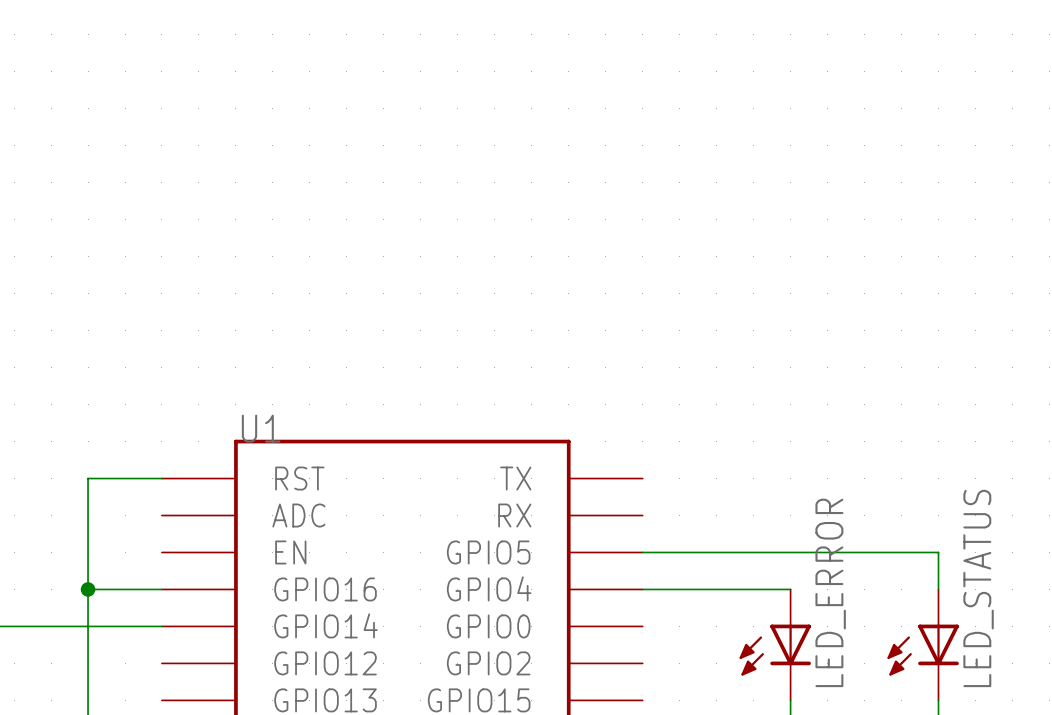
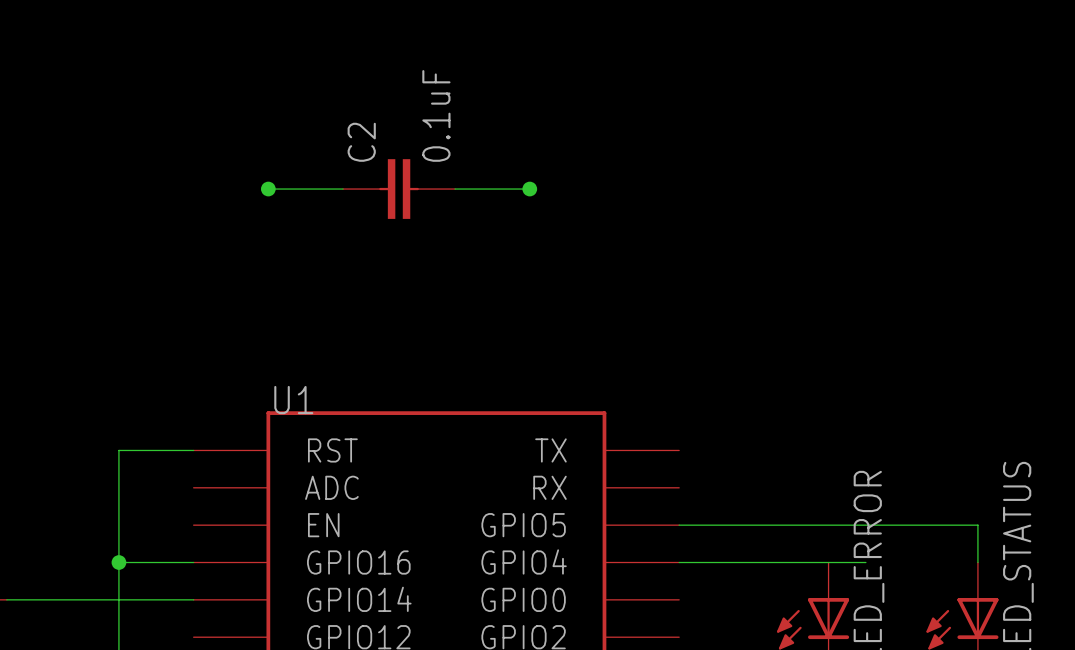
wire: none -> (268, 189) (343, 189)
junction: none -> (268, 189)
C2: none -> 0.1uF (399, 189)
wire: none -> (455, 189) (529, 189)
junction: none -> (529, 189)
wire: none -> (828, 562) (865, 562)

